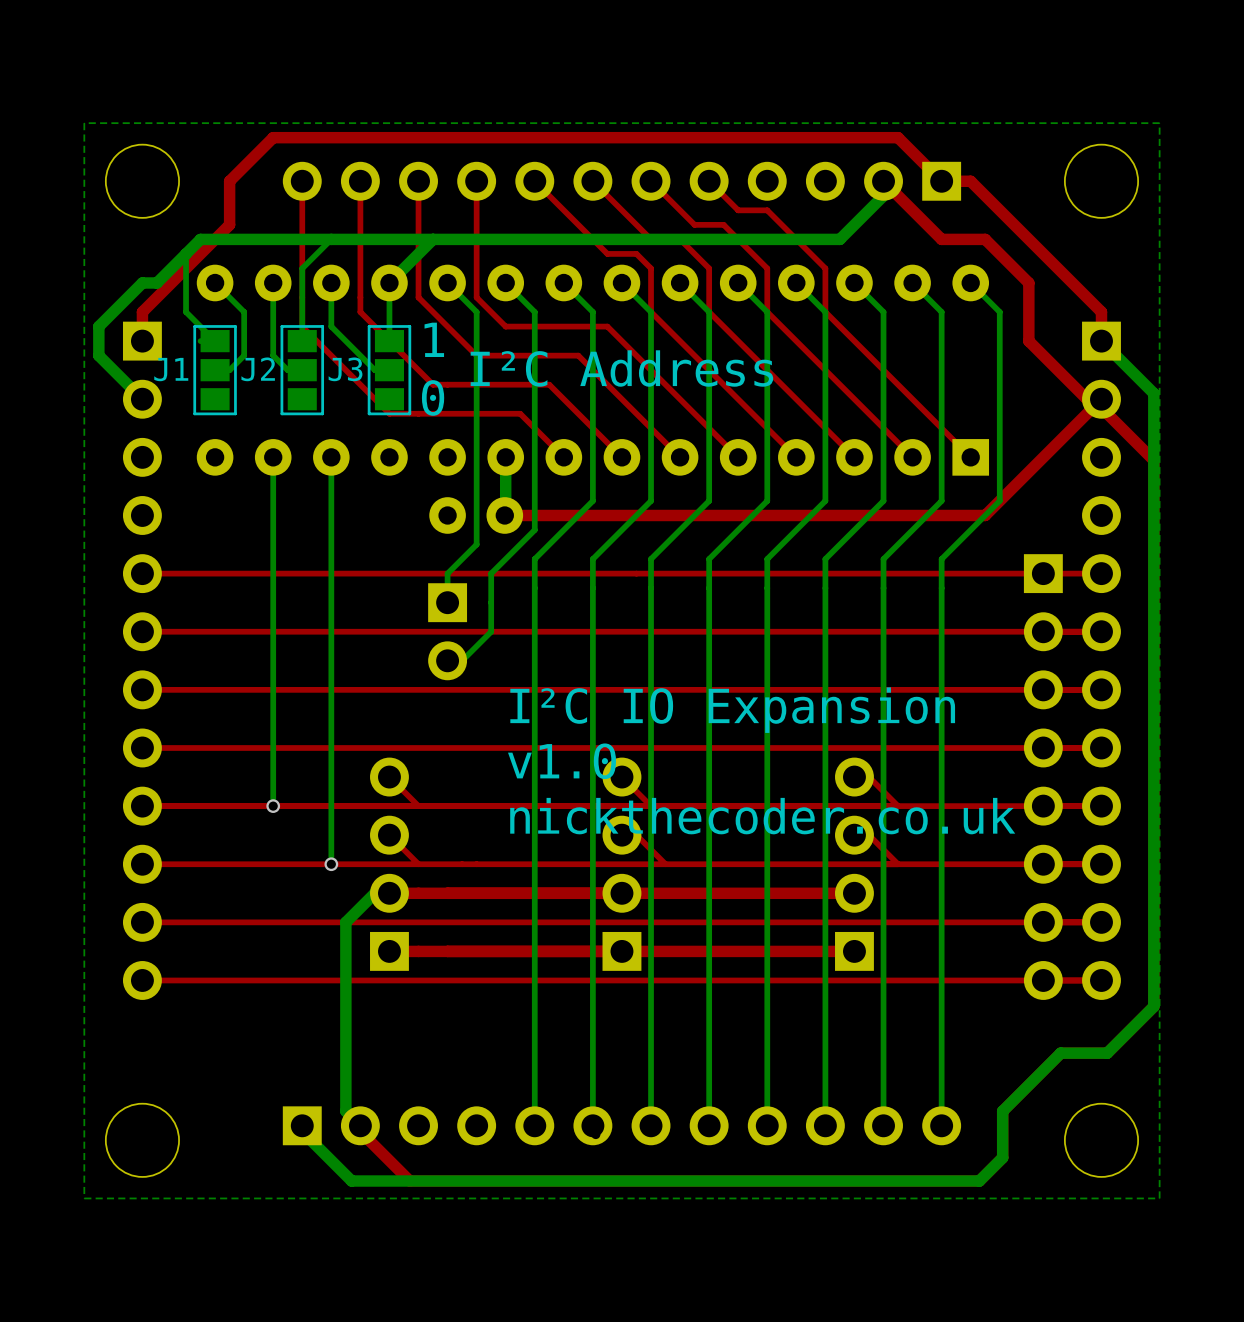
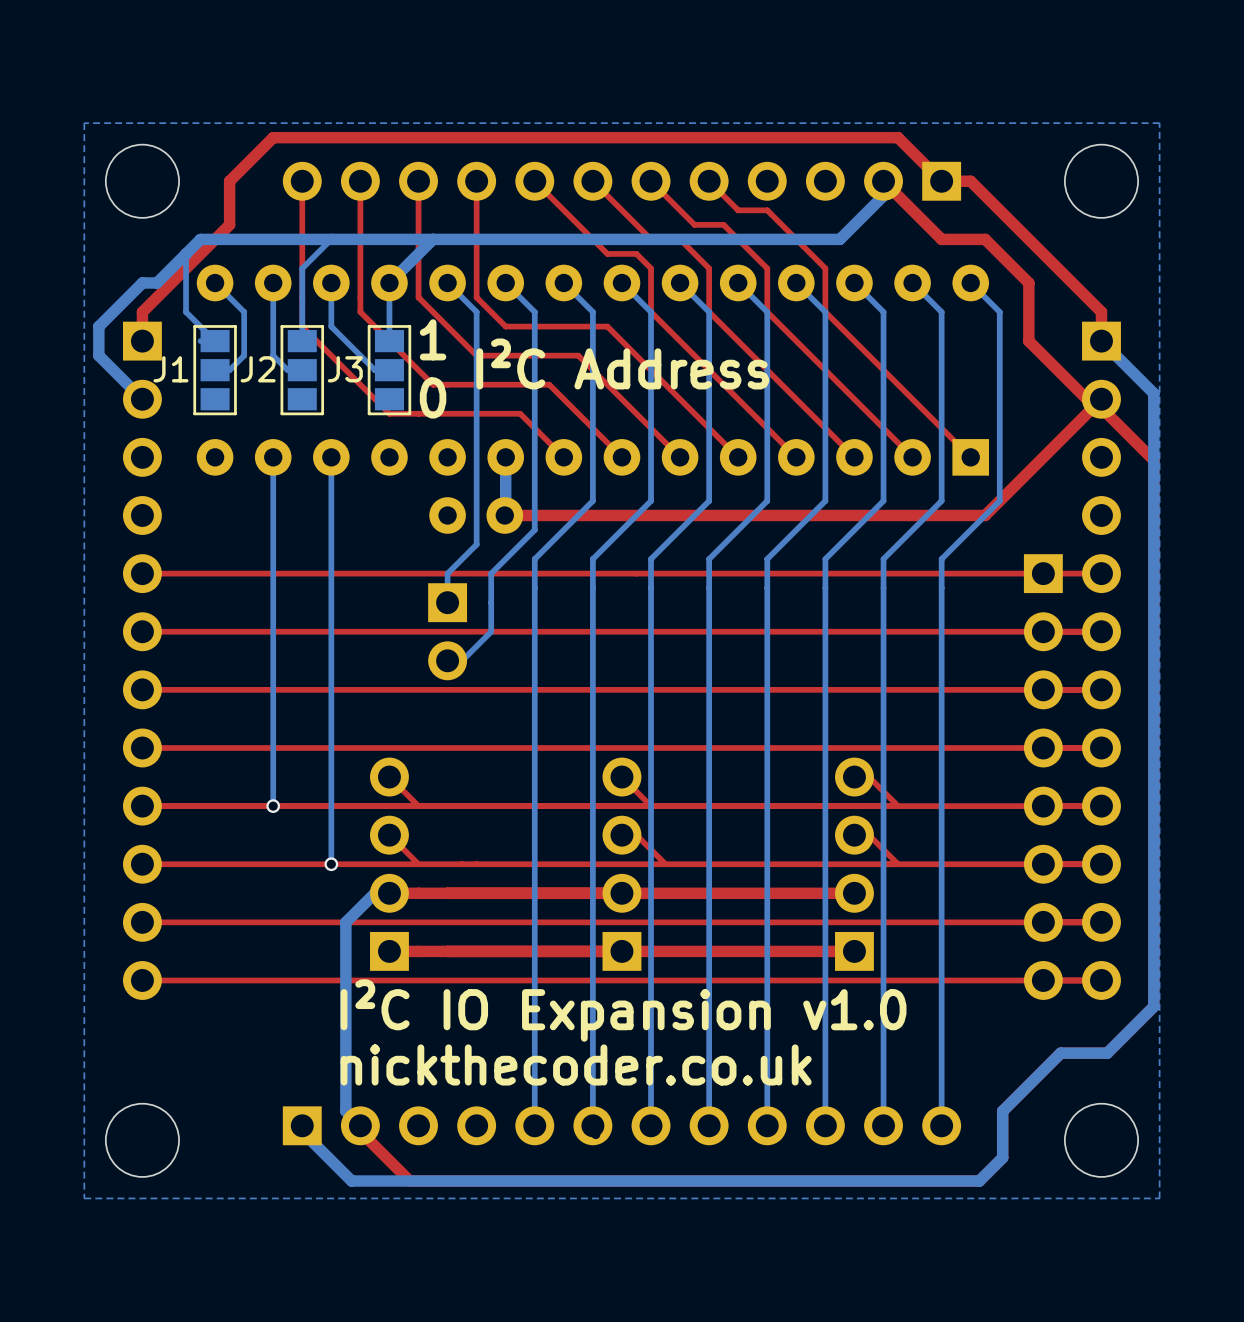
text: I²C IO Expansion (732, 710) -> none
text: v1.0 (562, 761) -> none
text position: nickthecoder.co.uk (762, 816) -> nickthecoder.co.uk (576, 1064)
text: none -> I²C IO Expansion v1.0 (623, 1010)

